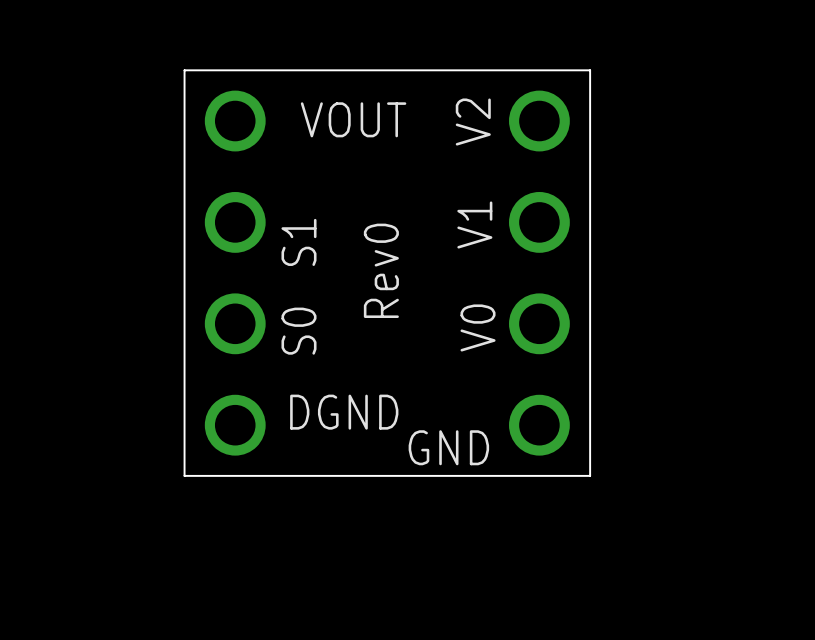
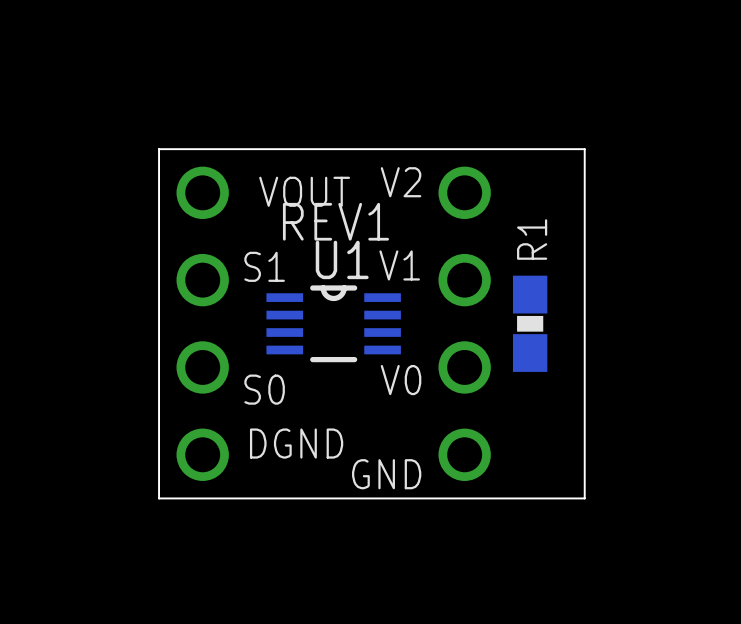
board edge: (590, 70) (590, 475) -> (508, 149) (584, 149) (584, 498) (508, 498)
text rotation: 0° (473, 122) -> 90° clockwise (401, 182)
text: none -> REV1 (335, 221)
text rotation: 0° (474, 224) -> 90° clockwise (399, 265)
text rotation: 0° (298, 242) -> 90° clockwise (264, 266)
text: Rev0 (381, 270) -> none
U1: none -> (333, 323)
R1: none -> (530, 323)
text rotation: 0° (478, 327) -> 90° clockwise (401, 380)
text rotation: 0° (298, 331) -> 90° clockwise (264, 389)

